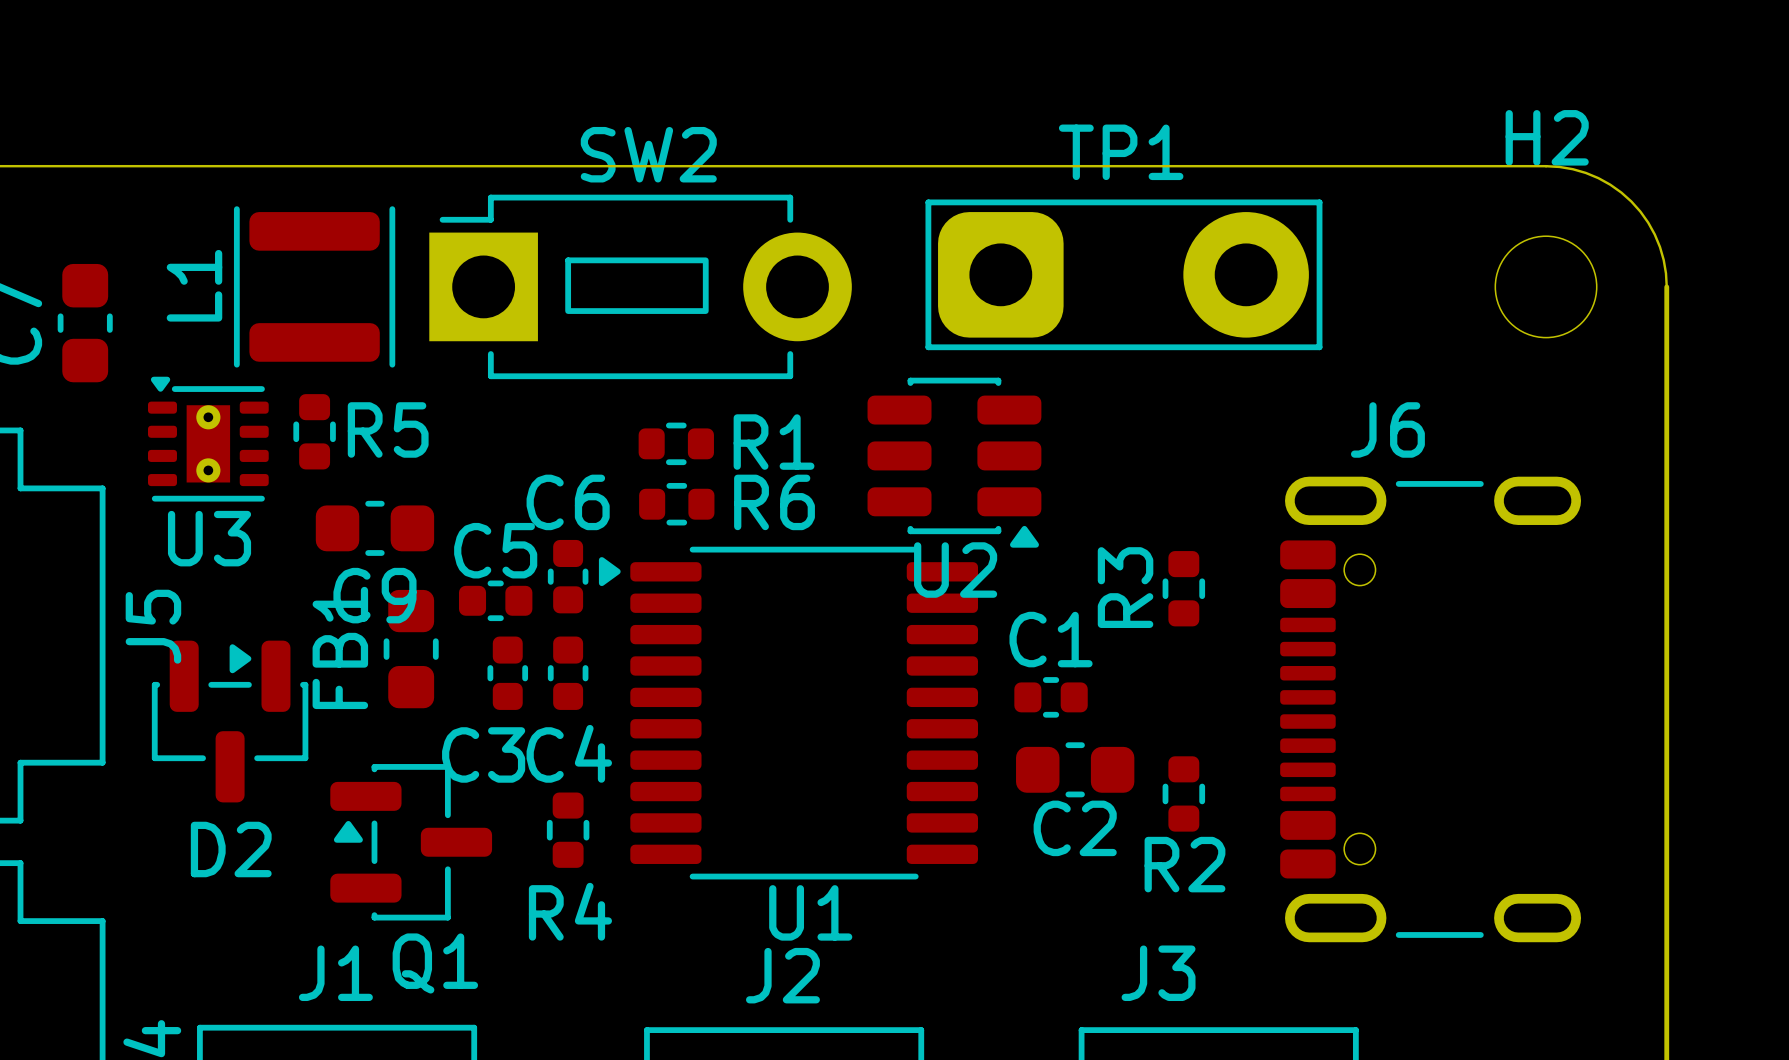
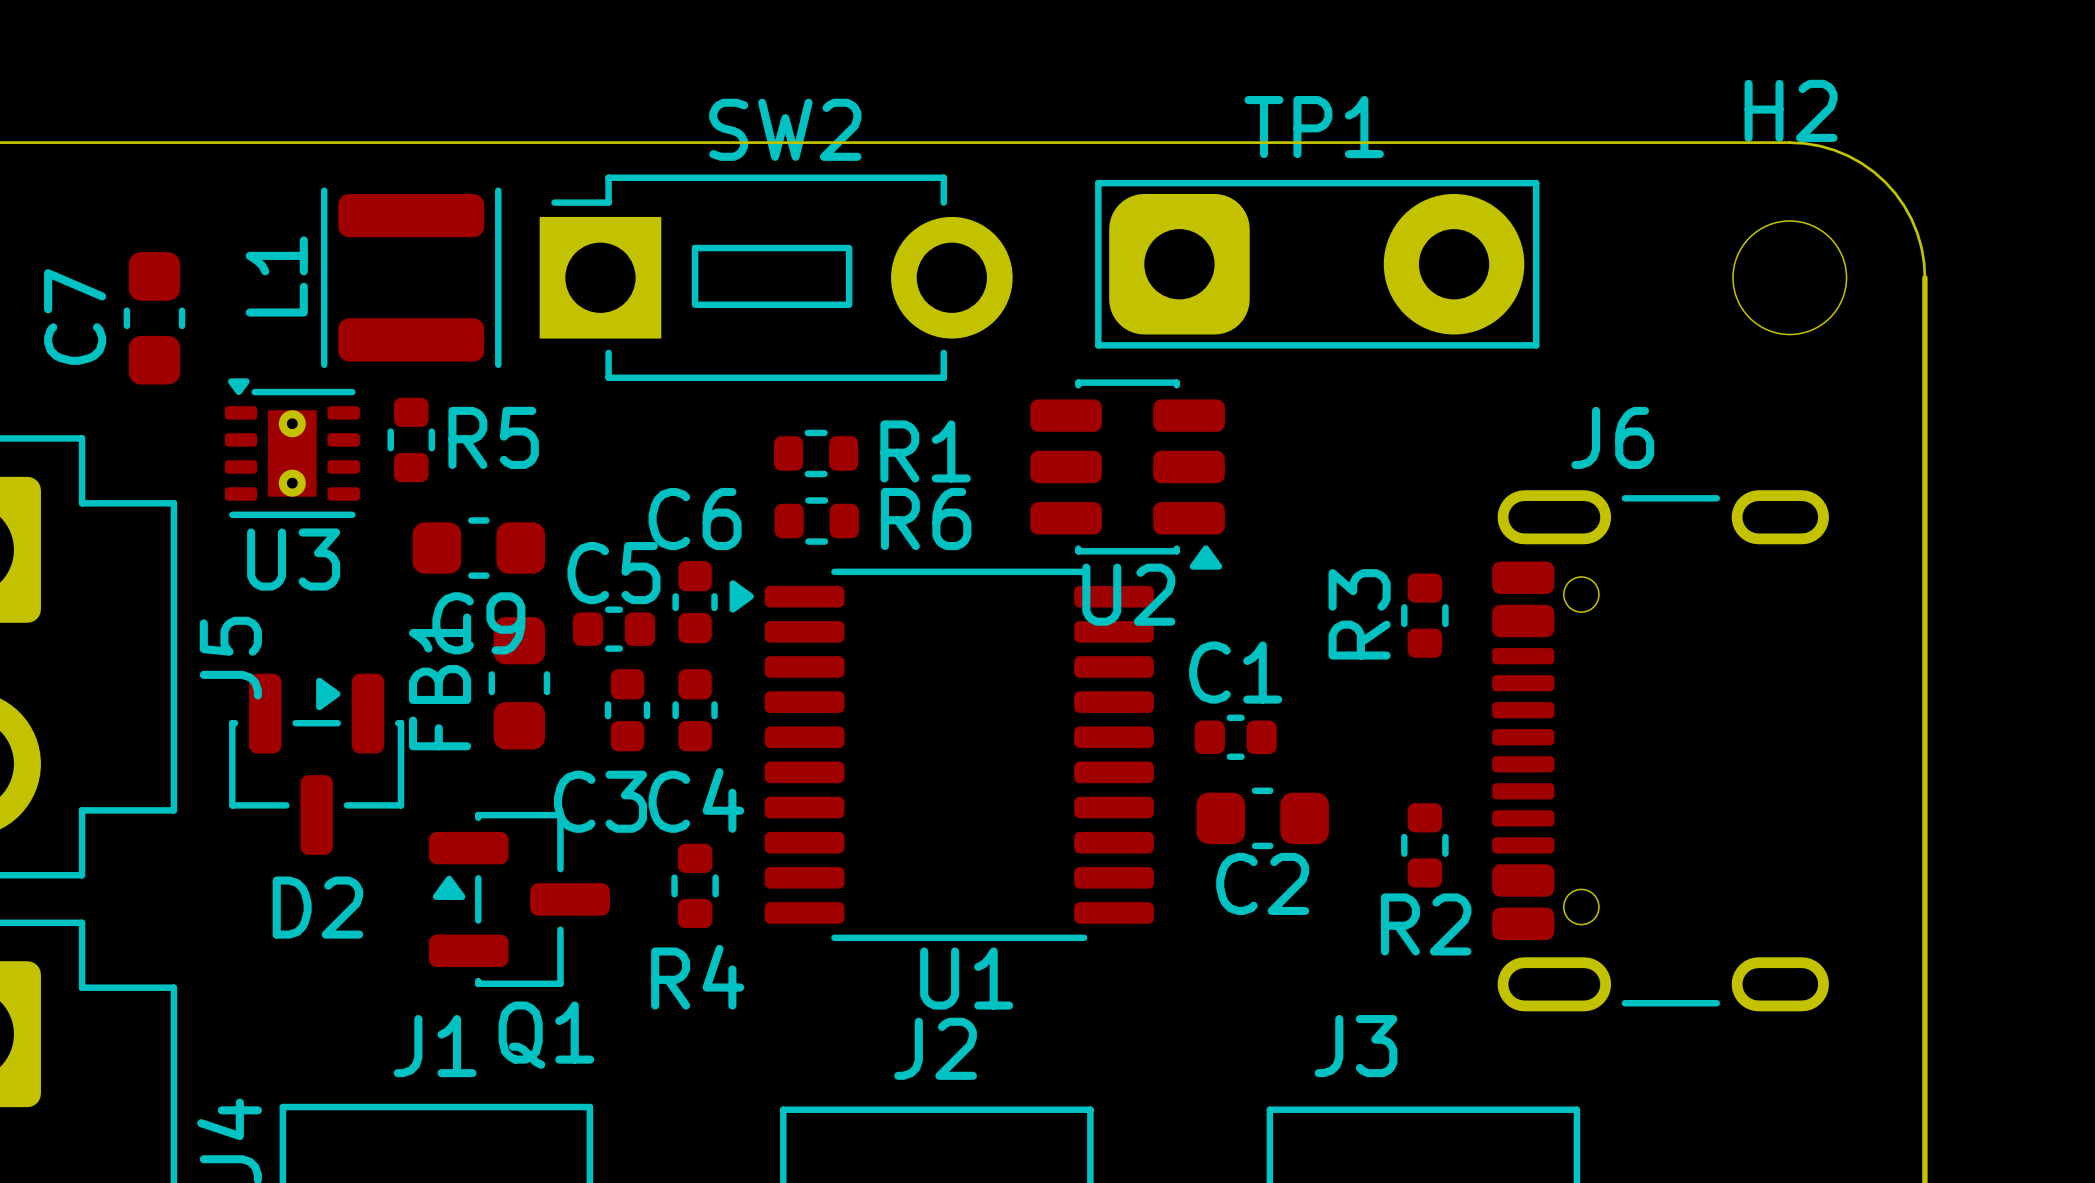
R3 position: (1183, 588) -> (1424, 615)
R2 position: (1183, 793) -> (1424, 845)

